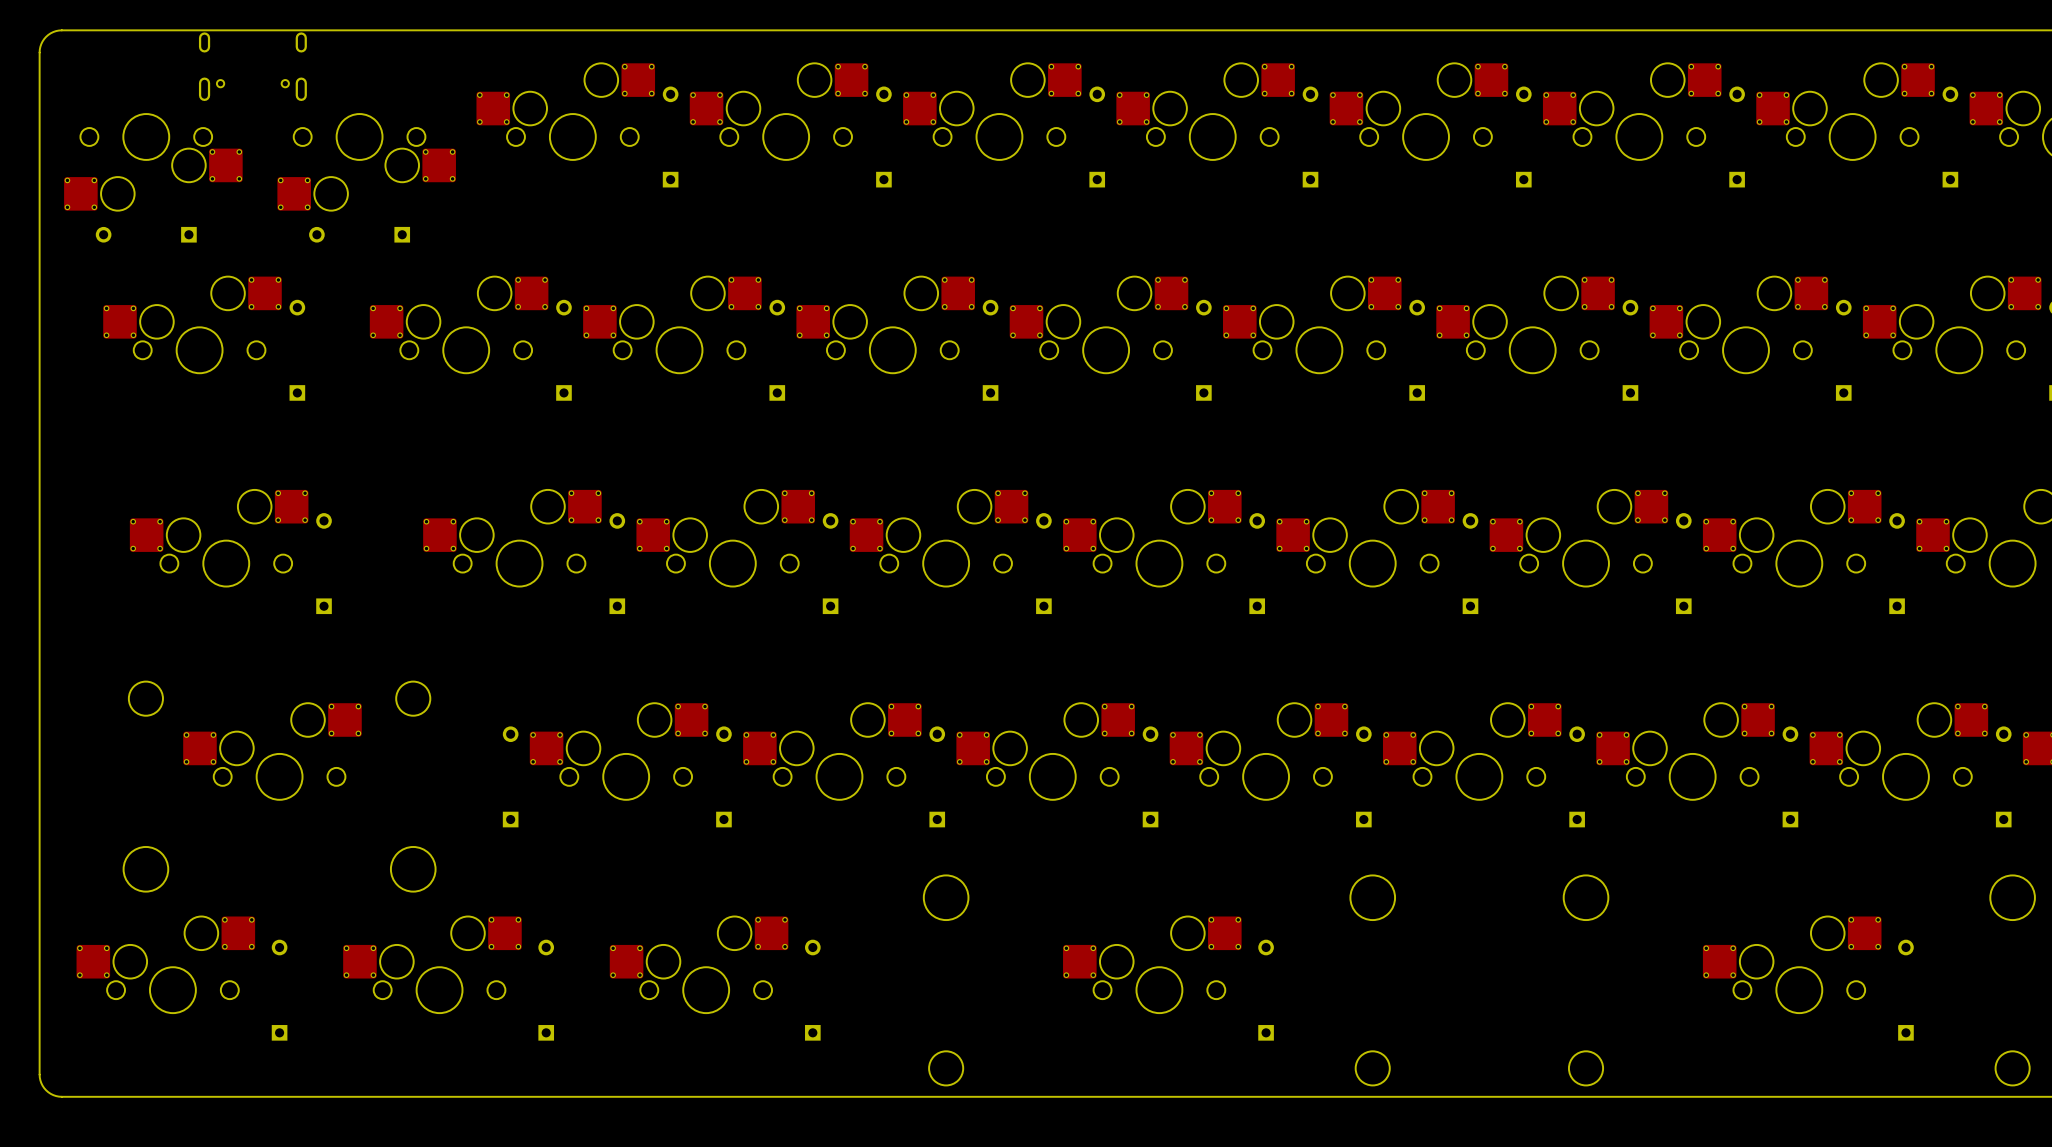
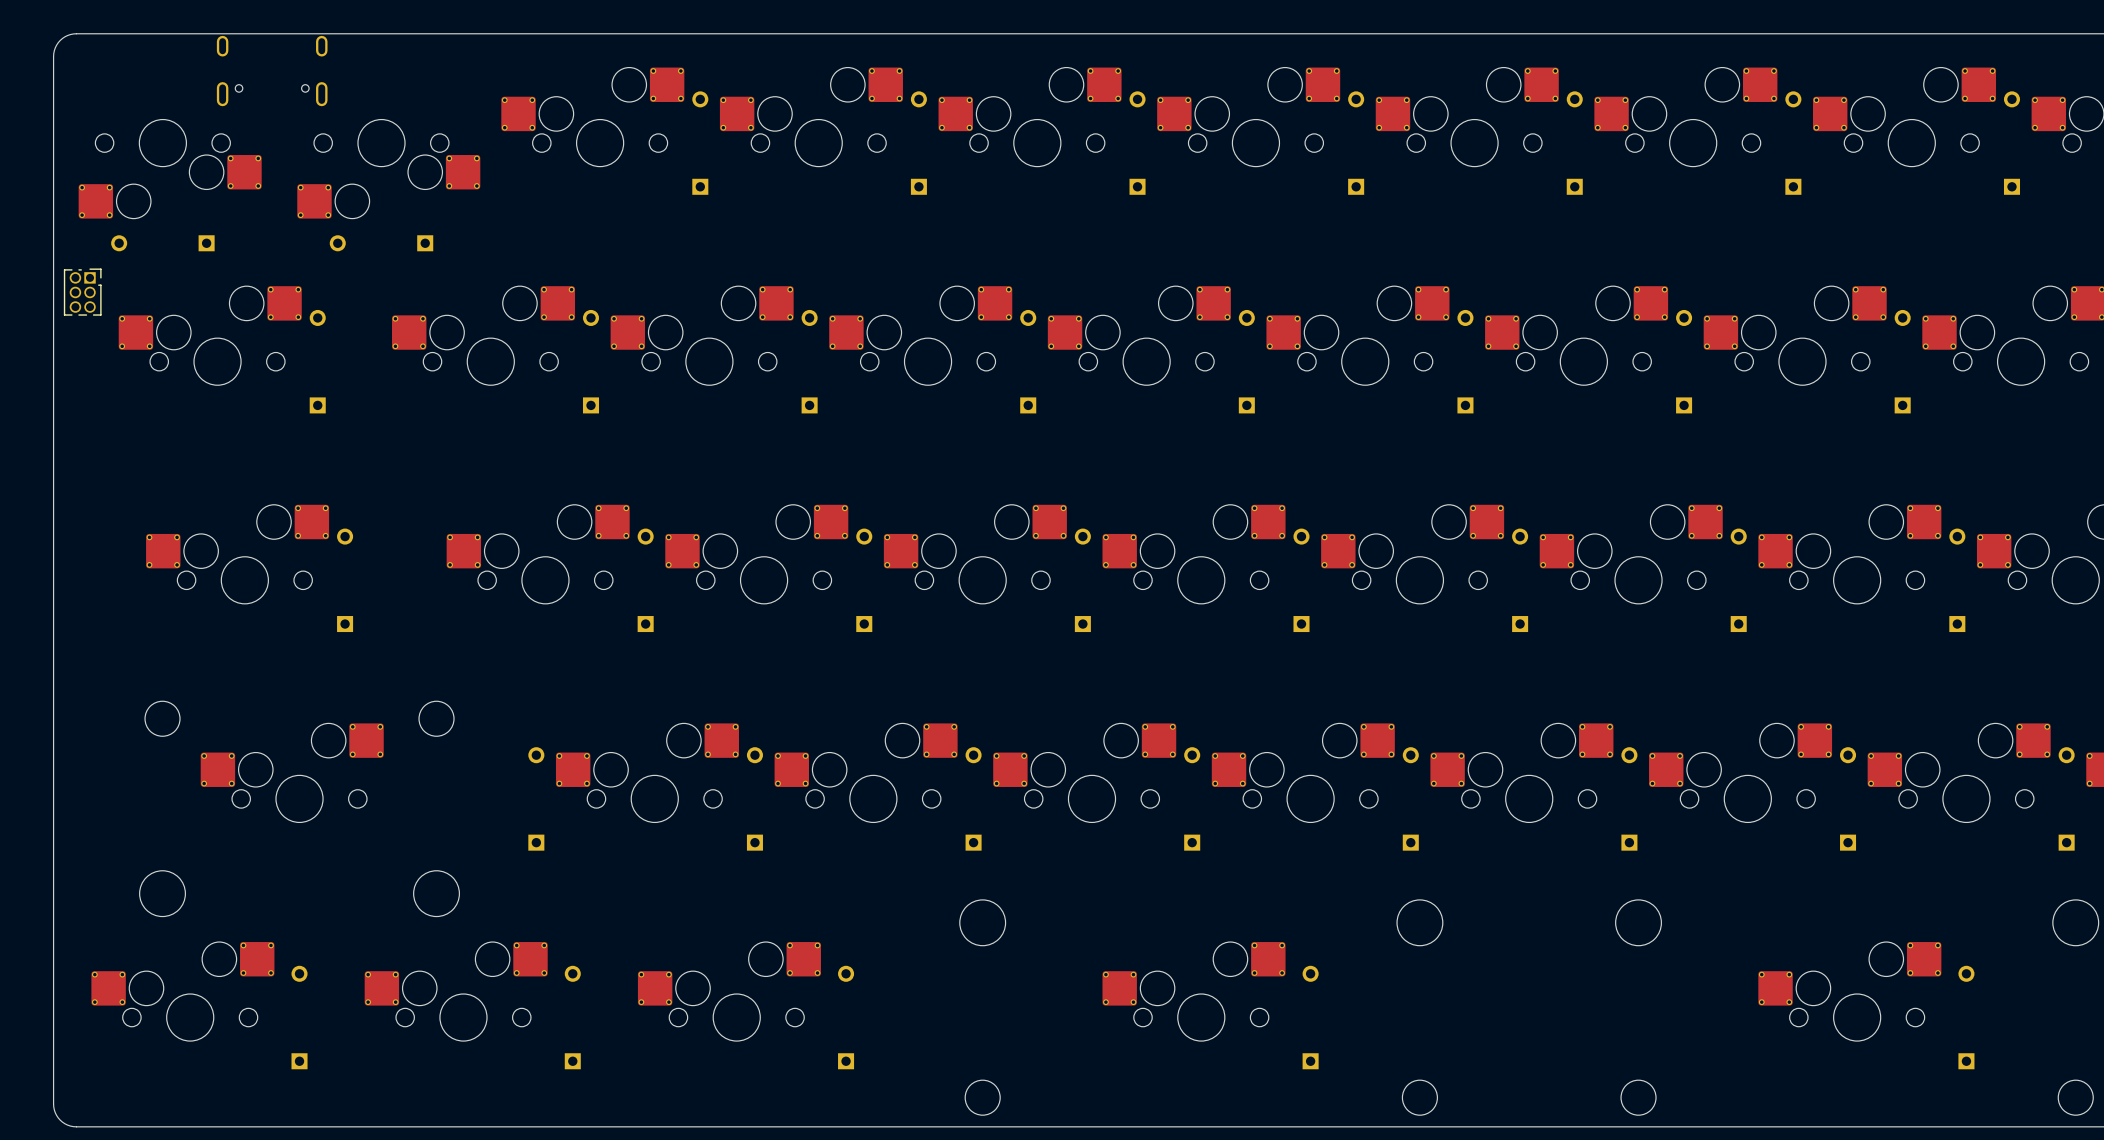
part: none -> (82, 292)

